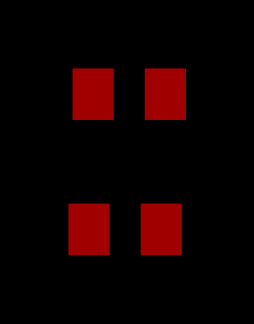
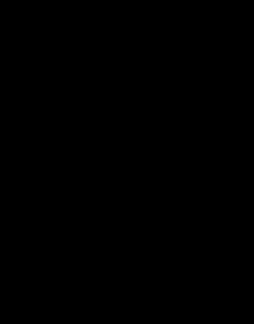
part: (129, 94) -> none
part: (125, 229) -> none

